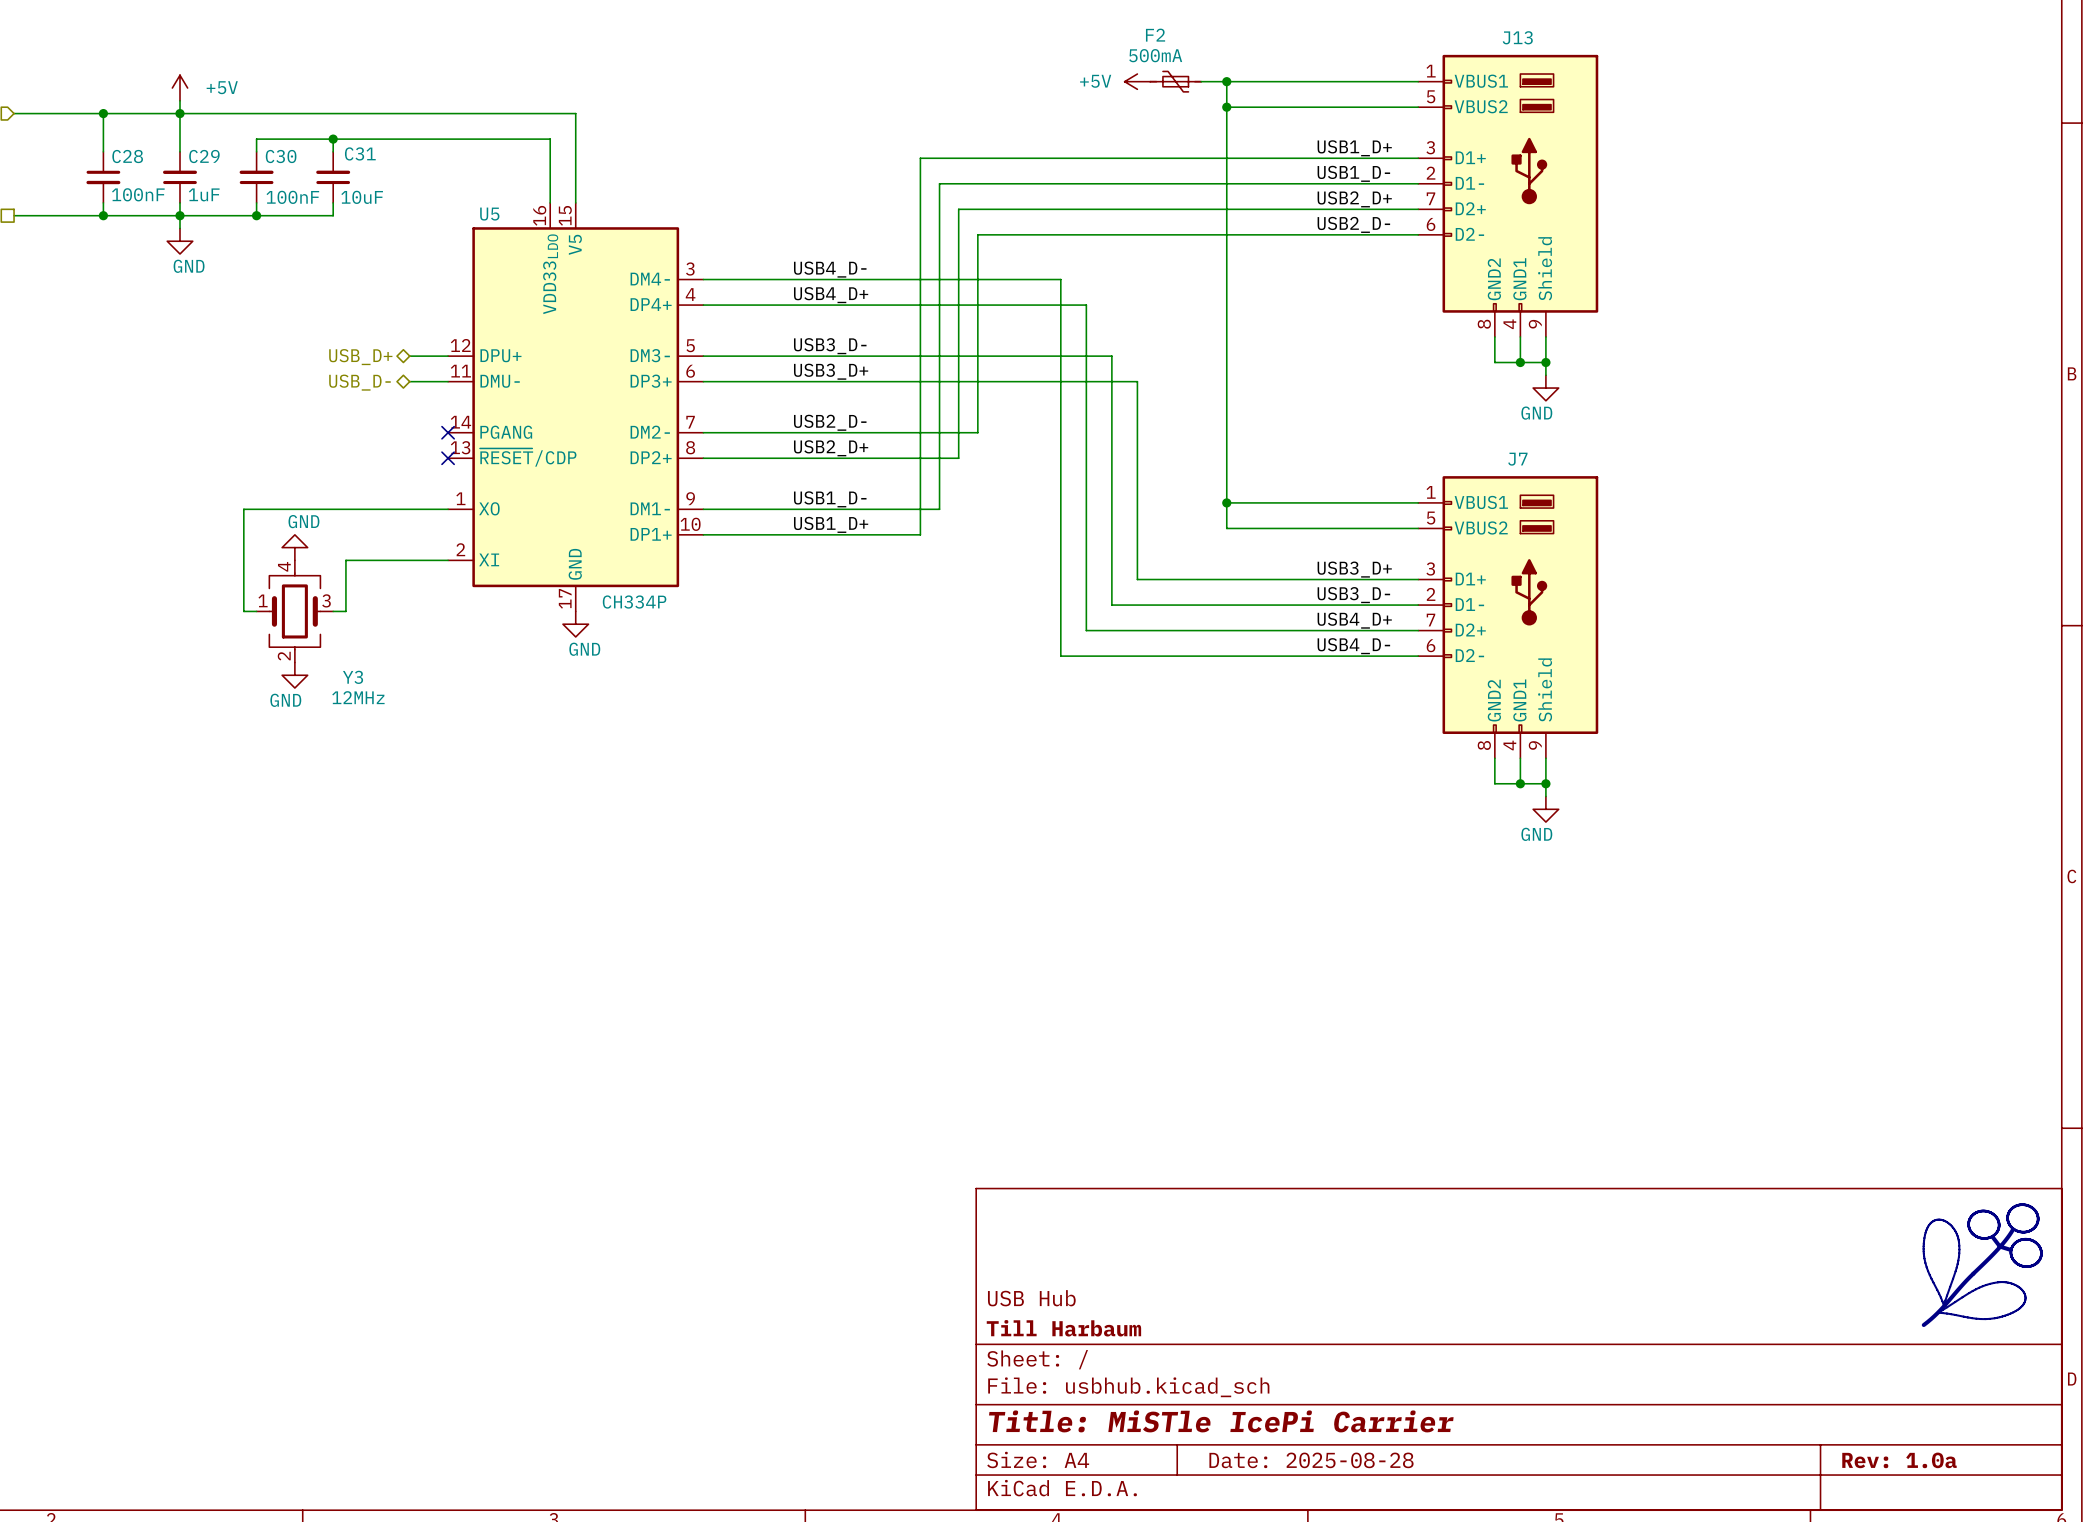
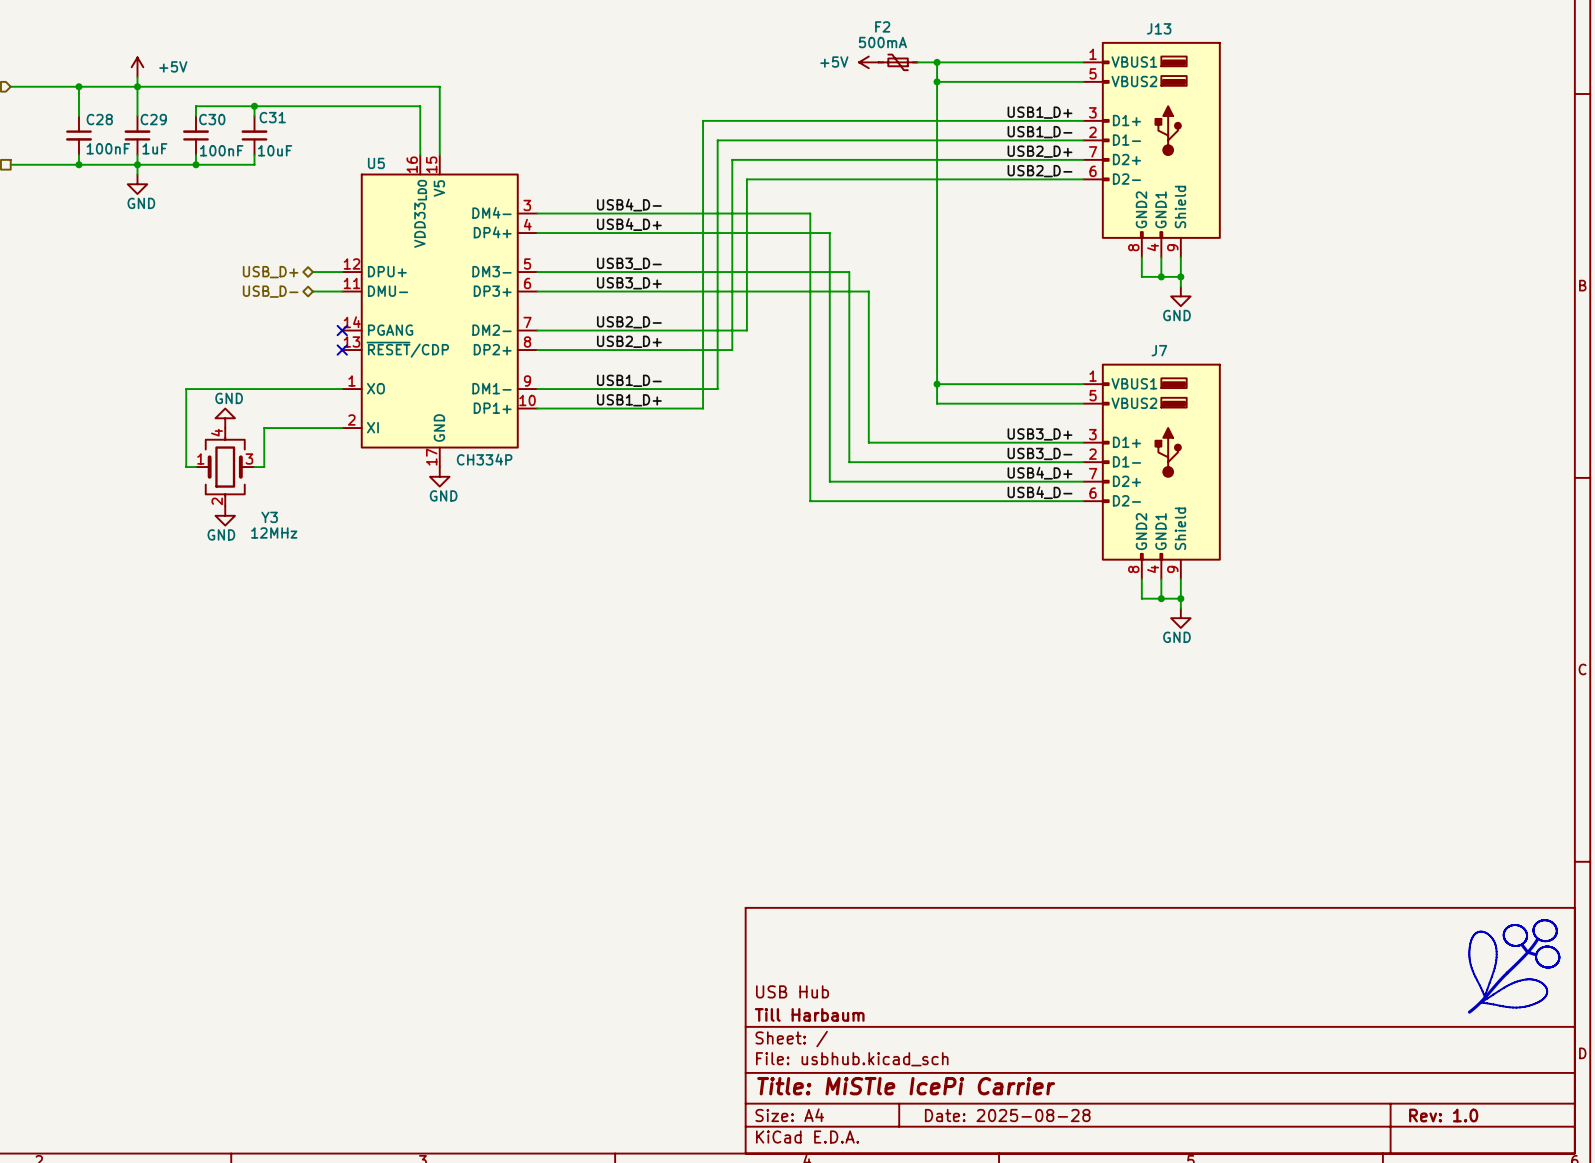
title block: Rev: 1.0a (1899, 1460) -> Rev: 1.0 (1443, 1115)

